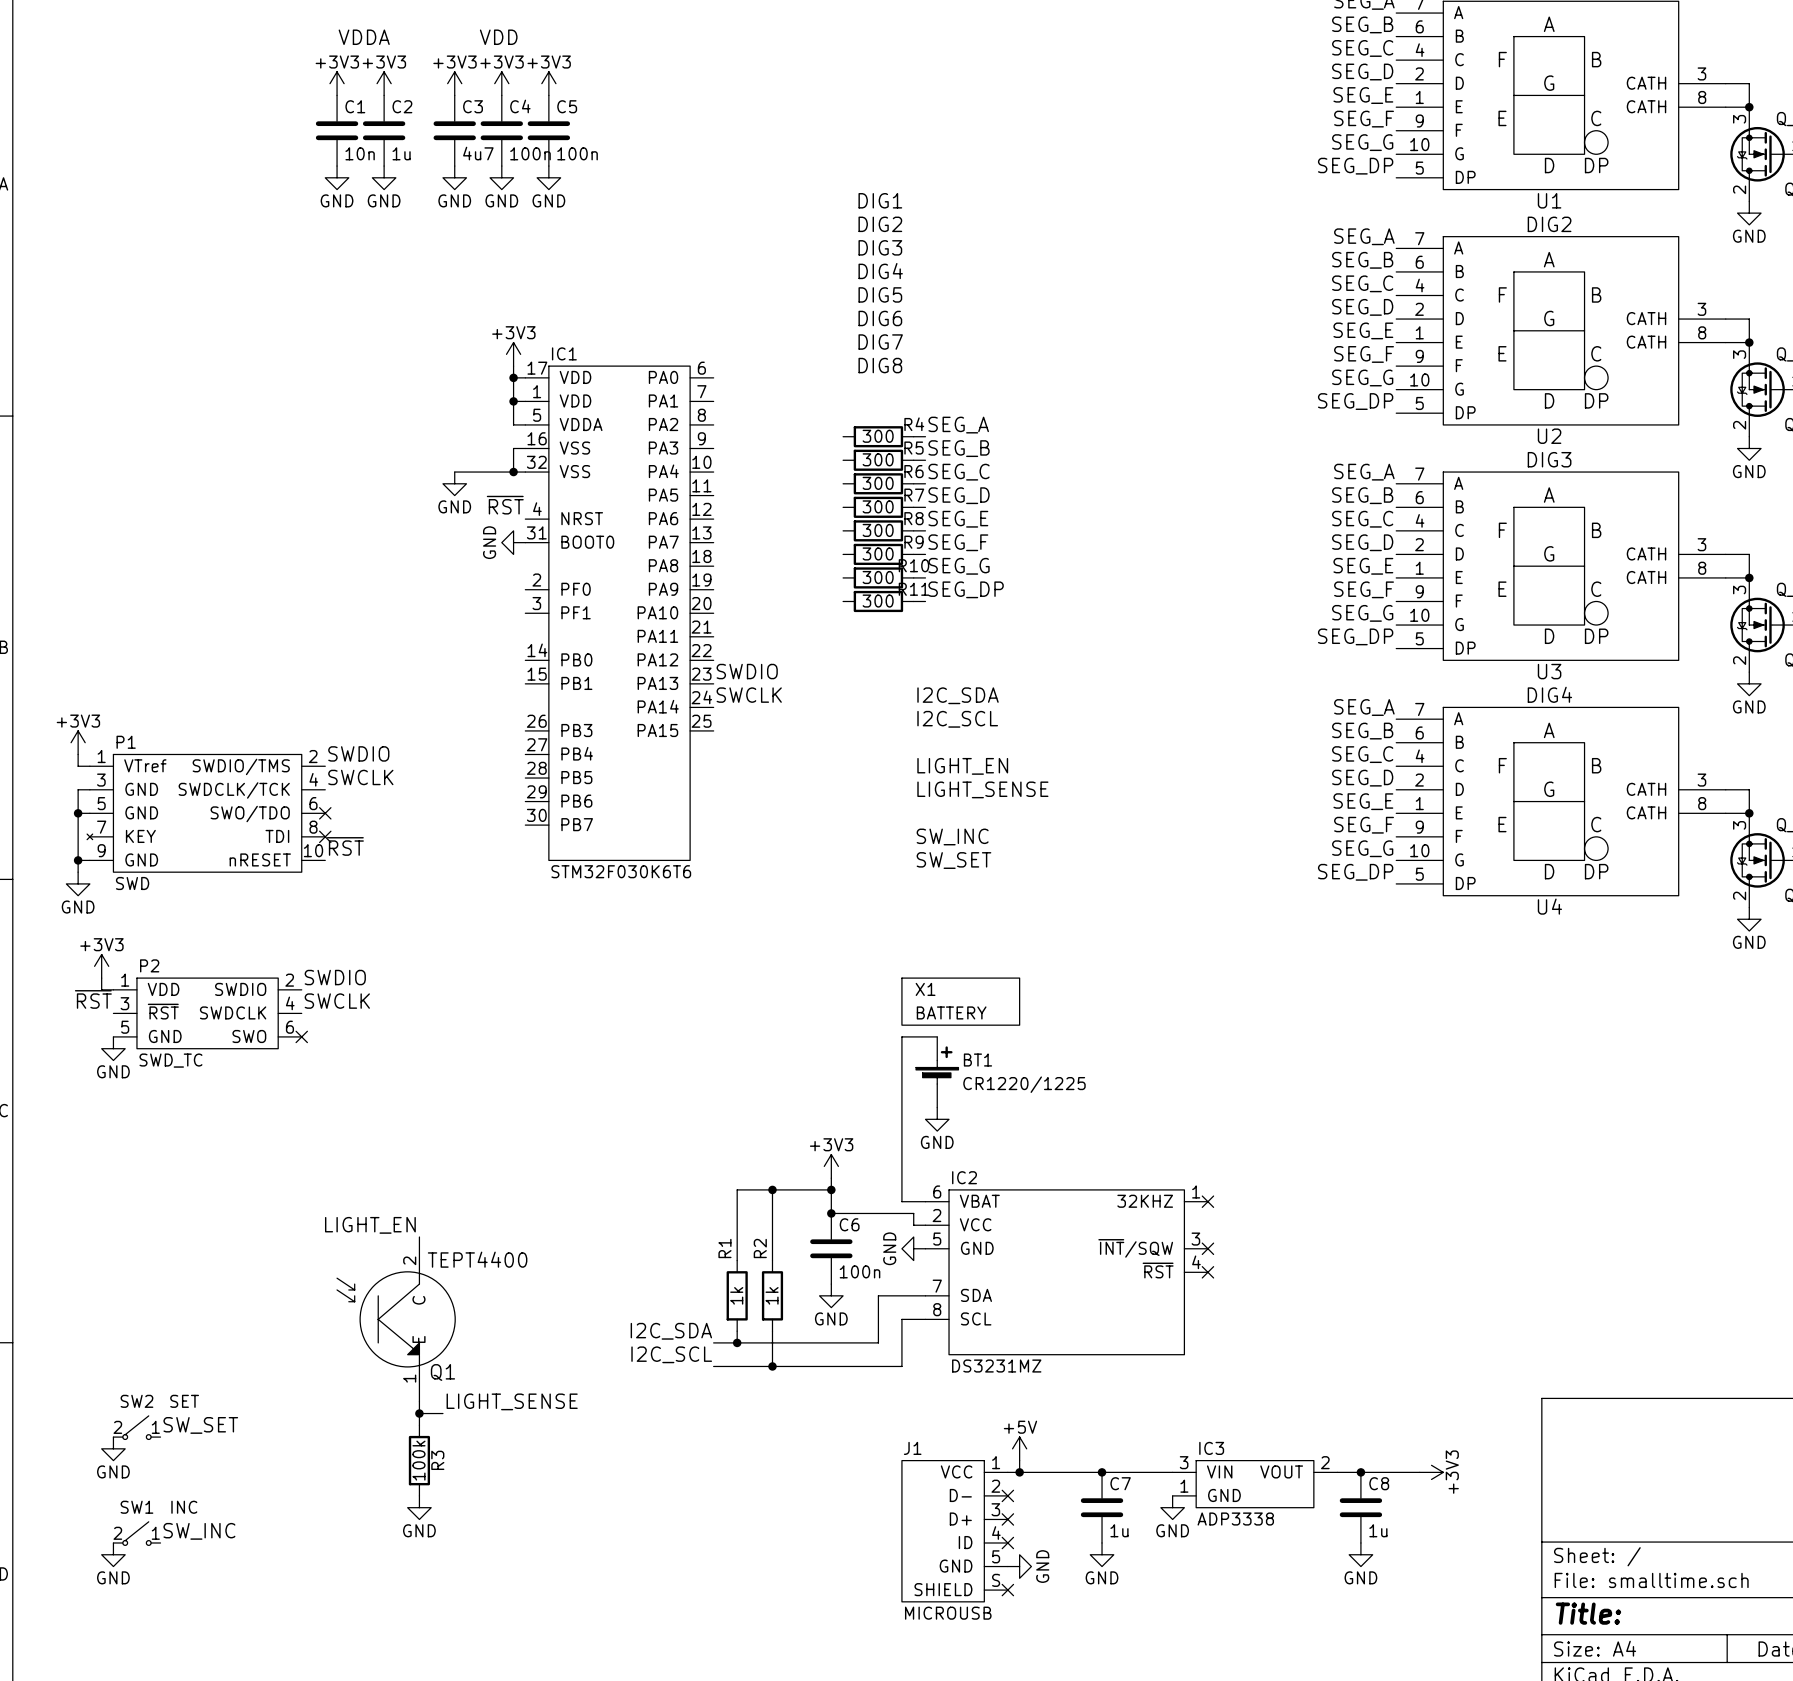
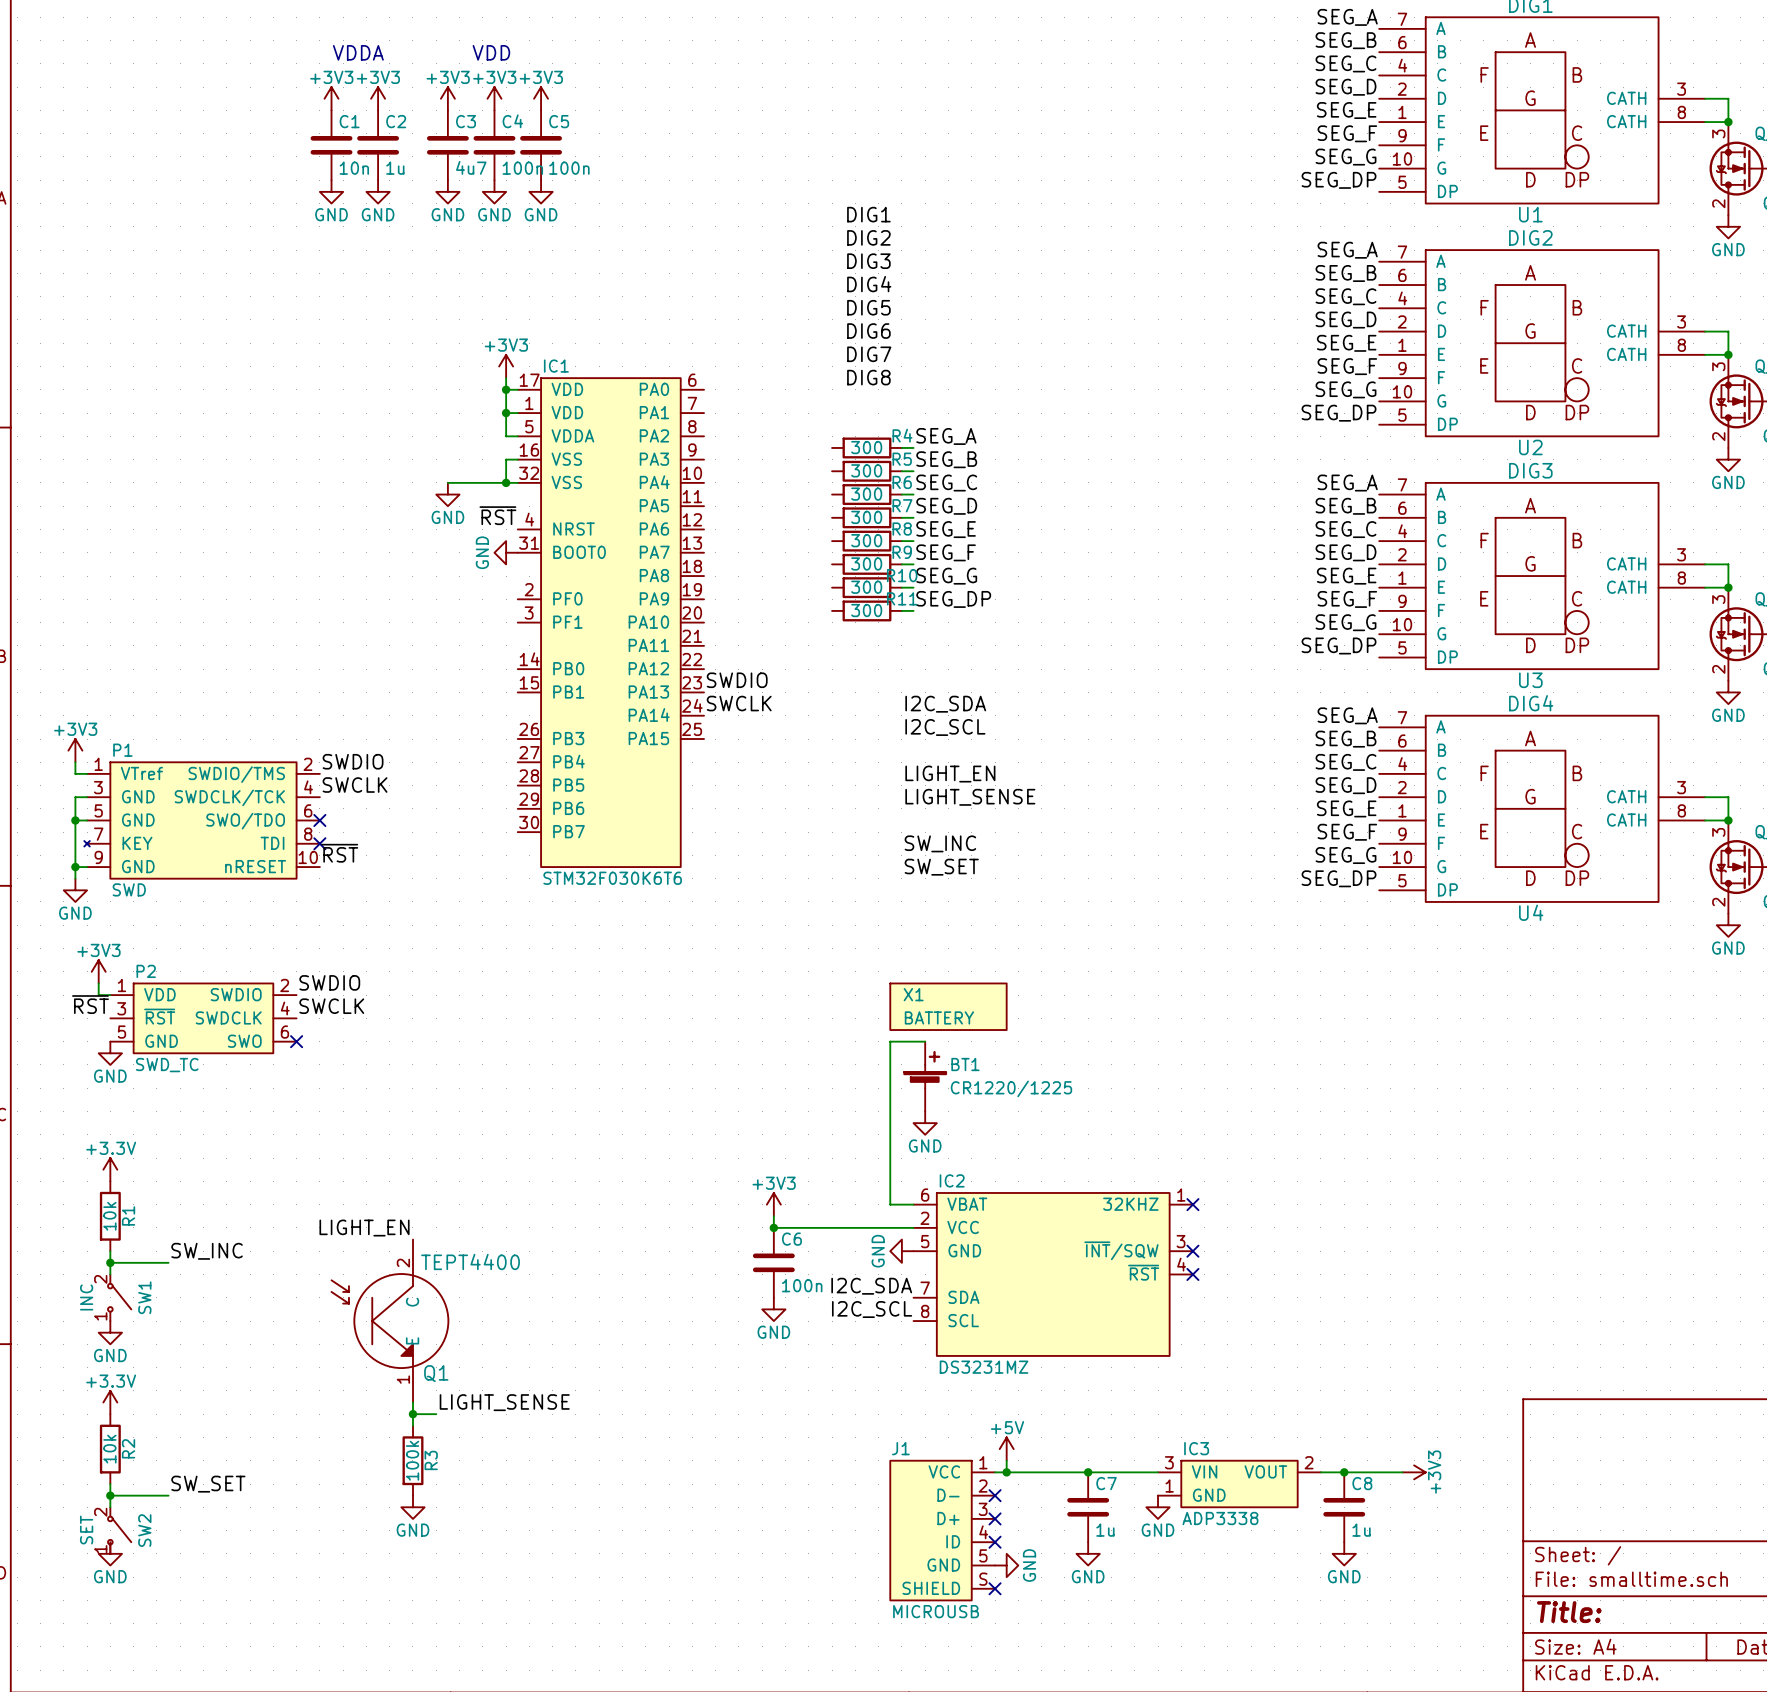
power symbol: none -> +3.3V (110, 1169)
power symbol position: +3V3 (831, 1166) -> +3V3 (773, 1204)
wire: (831, 1178) (831, 1213) (913, 1213) (913, 1225) -> (773, 1216) (773, 1227) (901, 1227)
wire: (772, 1189) (772, 1260) -> none
junction: (772, 1189) -> none
wire: (831, 1189) (737, 1189) (737, 1260) -> none
junction: (831, 1189) -> none
junction: (831, 1213) -> none
junction: none -> (773, 1227)
wire: none -> (110, 1251) (110, 1274)
label: none -> SW_INC (207, 1251)
R1 name position: R1 (724, 1248) -> R1 (128, 1215)
R2 name position: R2 (760, 1248) -> R2 (128, 1448)
C6 position: (831, 1248) -> (773, 1262)
wire: none -> (110, 1262) (168, 1262)
junction: none -> (110, 1262)
R1 value: 1k (736, 1295) -> 10k (109, 1216)
R1 position: (737, 1295) -> (110, 1216)
R2 position: (772, 1295) -> (110, 1449)
R2 value: 1k (772, 1295) -> 10k (109, 1449)
power symbol position: GND (831, 1295) -> GND (773, 1309)
wire: (925, 1295) (878, 1295) (878, 1342) (713, 1342) -> none
wire: (925, 1319) (901, 1319) (901, 1366) (713, 1366) -> none
label position: I2C_SDA (671, 1331) -> I2C_SDA (871, 1286)
wire: (737, 1331) (737, 1342) -> none
wire: (772, 1331) (772, 1366) -> none
junction: (737, 1342) -> none
label position: I2C_SCL (671, 1354) -> I2C_SCL (872, 1309)
junction: (772, 1366) -> none
power symbol: none -> +3.3V (110, 1402)
SW2 value position: SET (184, 1401) -> SET (86, 1530)
label position: SW_SET (200, 1425) -> SW_SET (208, 1484)
SW2 rotation: 0° (136, 1427) -> 90° clockwise (119, 1530)
SW2 position: (136, 1427) -> (119, 1530)
power symbol position: GND (113, 1448) -> GND (110, 1332)
wire: none -> (110, 1484) (110, 1507)
wire: none -> (110, 1495) (168, 1495)
junction: none -> (110, 1495)
SW1 value position: INC (184, 1507) -> INC (86, 1297)
label: SW_INC (199, 1531) -> none
SW1 rotation: 0° (136, 1533) -> 90° clockwise (119, 1297)
SW1 position: (136, 1533) -> (119, 1297)

